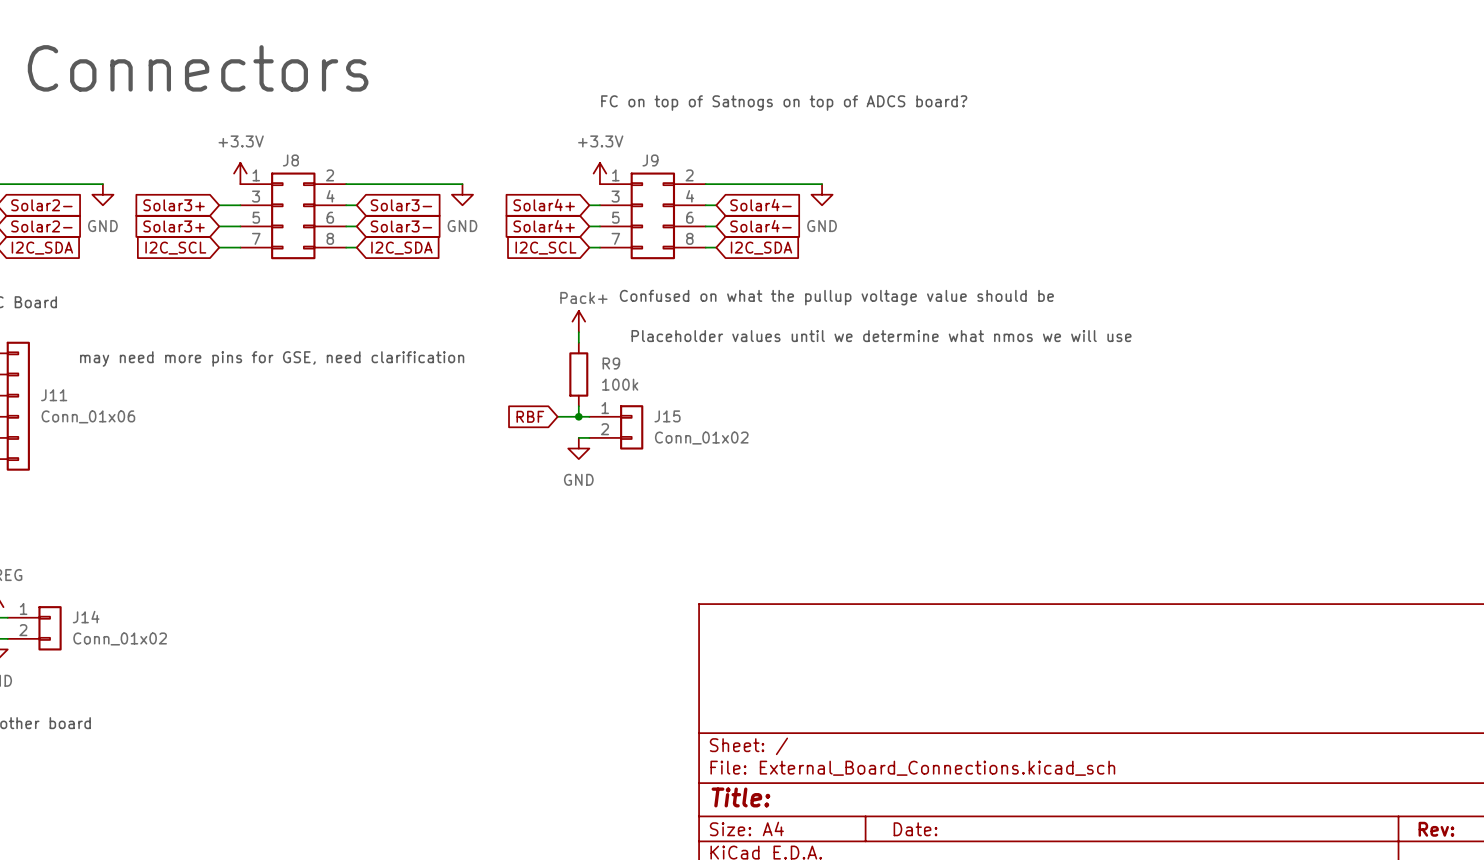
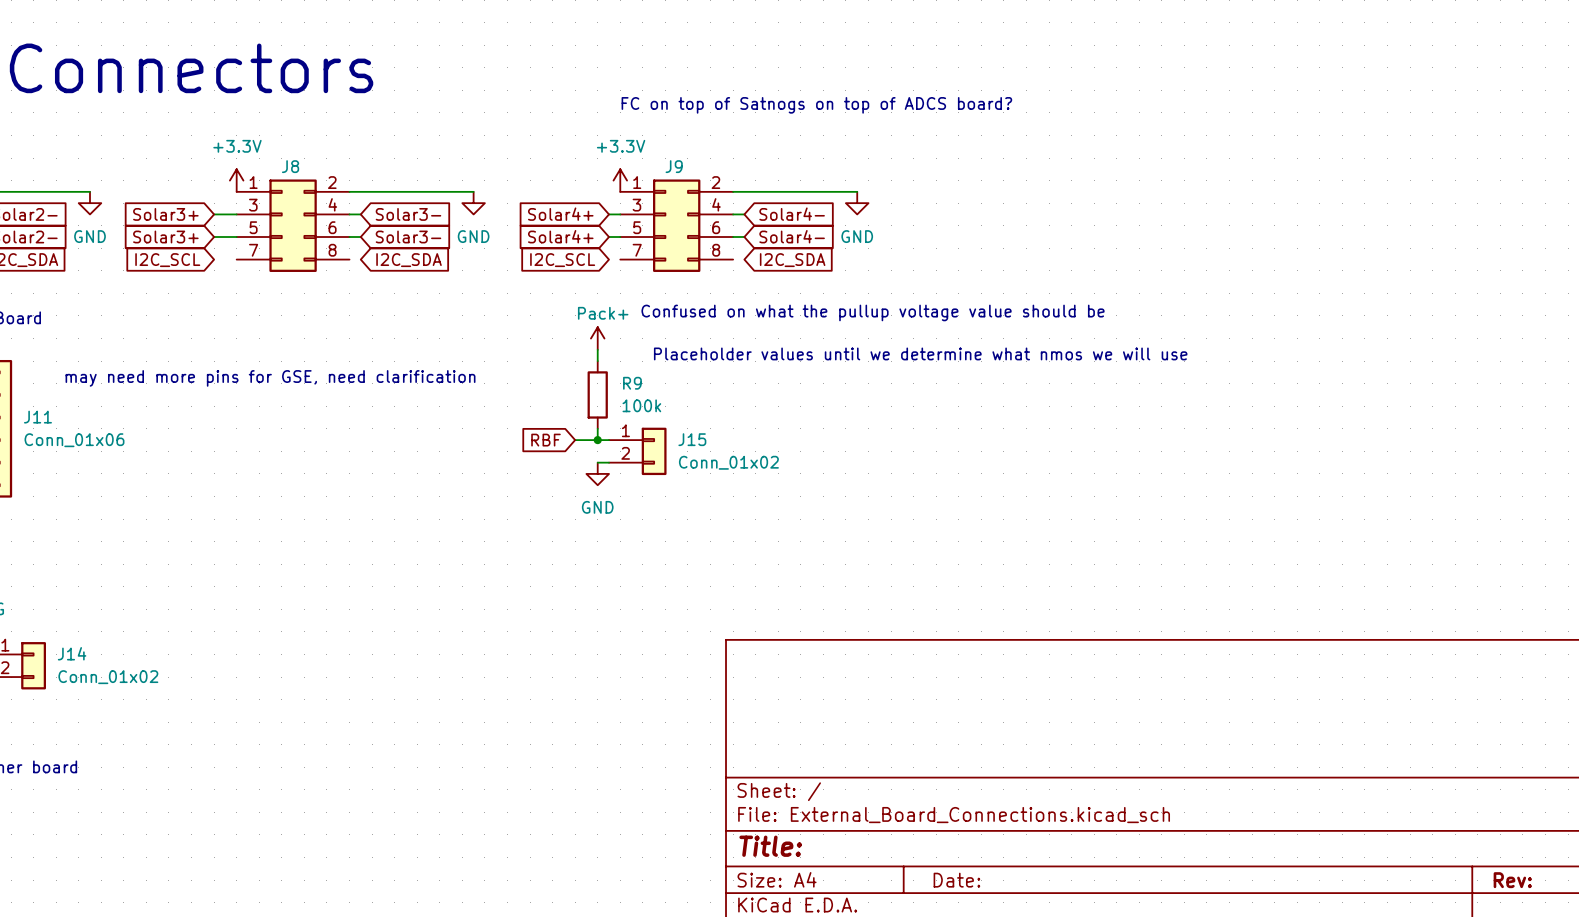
wire: (219, 247) (240, 247) -> none
wire: (346, 247) (356, 247) -> none
wire: (589, 247) (599, 247) -> none
wire: (705, 247) (716, 247) -> none

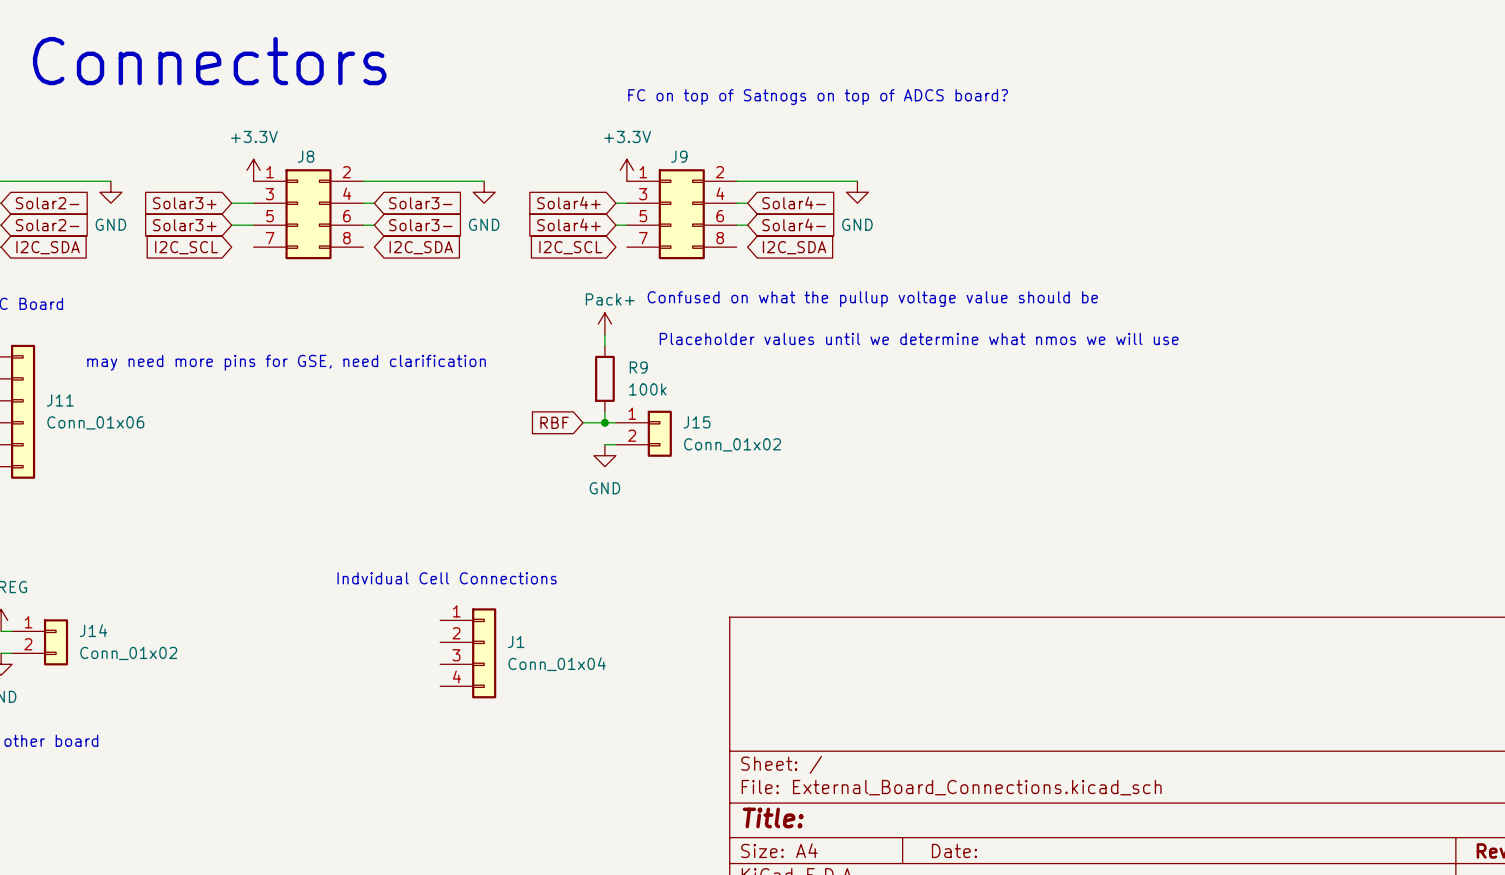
text: none -> Indvidual Cell Connections (447, 578)
J1: none -> Conn_01x04 (468, 653)

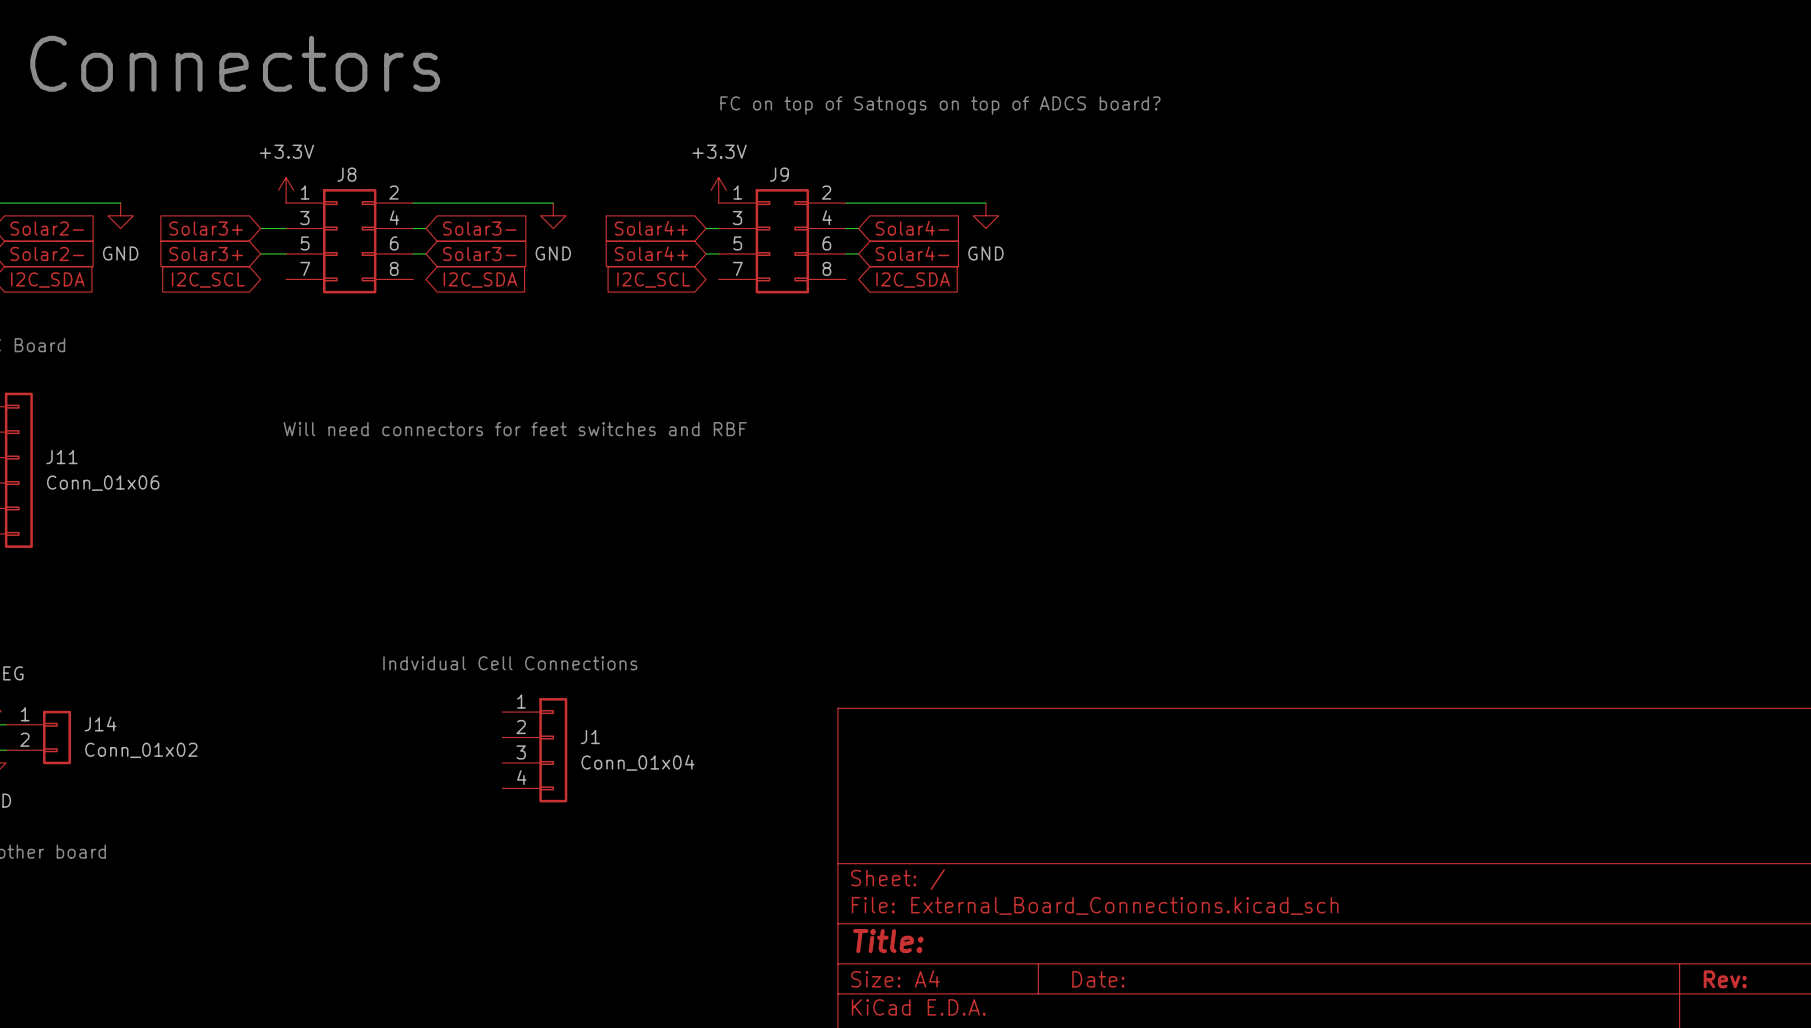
text: Confused on what the pullup voltage value should be (872, 299) -> none
power symbol: Pack+ (604, 323) -> none
wire: (604, 334) (604, 345) -> none
text: Placeholder values until we determine what nmos we will use (919, 338) -> none
text: may need more pins for GSE, need clarification (286, 362) -> none
text: none -> Will need connectors for feet switches and RBF (515, 429)
R9: 100k (604, 378) -> none
wire: (604, 411) (604, 422) -> none
global label: RBF (554, 422) -> none
wire: (582, 422) (615, 422) -> none
junction: (604, 422) -> none
J15: Conn_01x02 (643, 433) -> none
wire: (604, 444) (615, 444) -> none
power symbol: GND (604, 455) -> none

